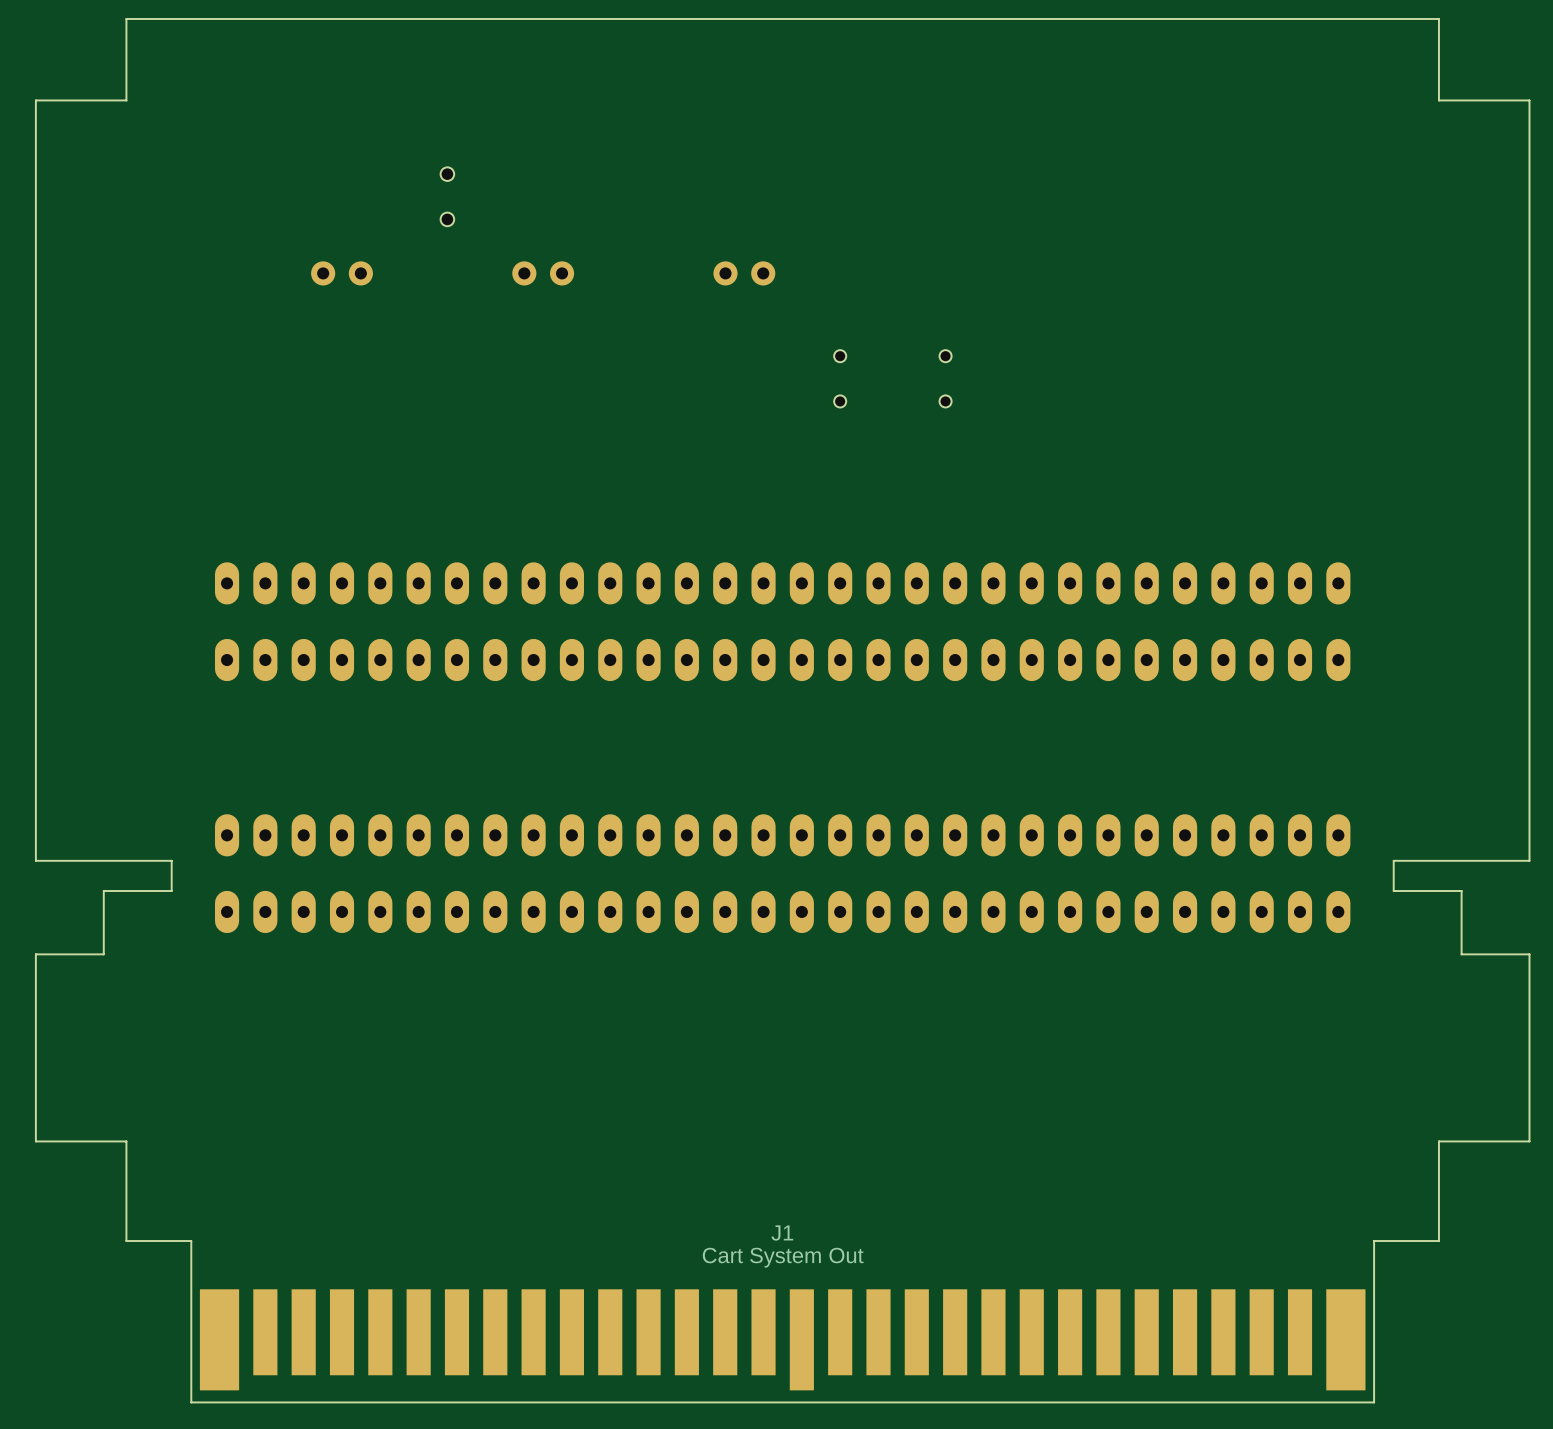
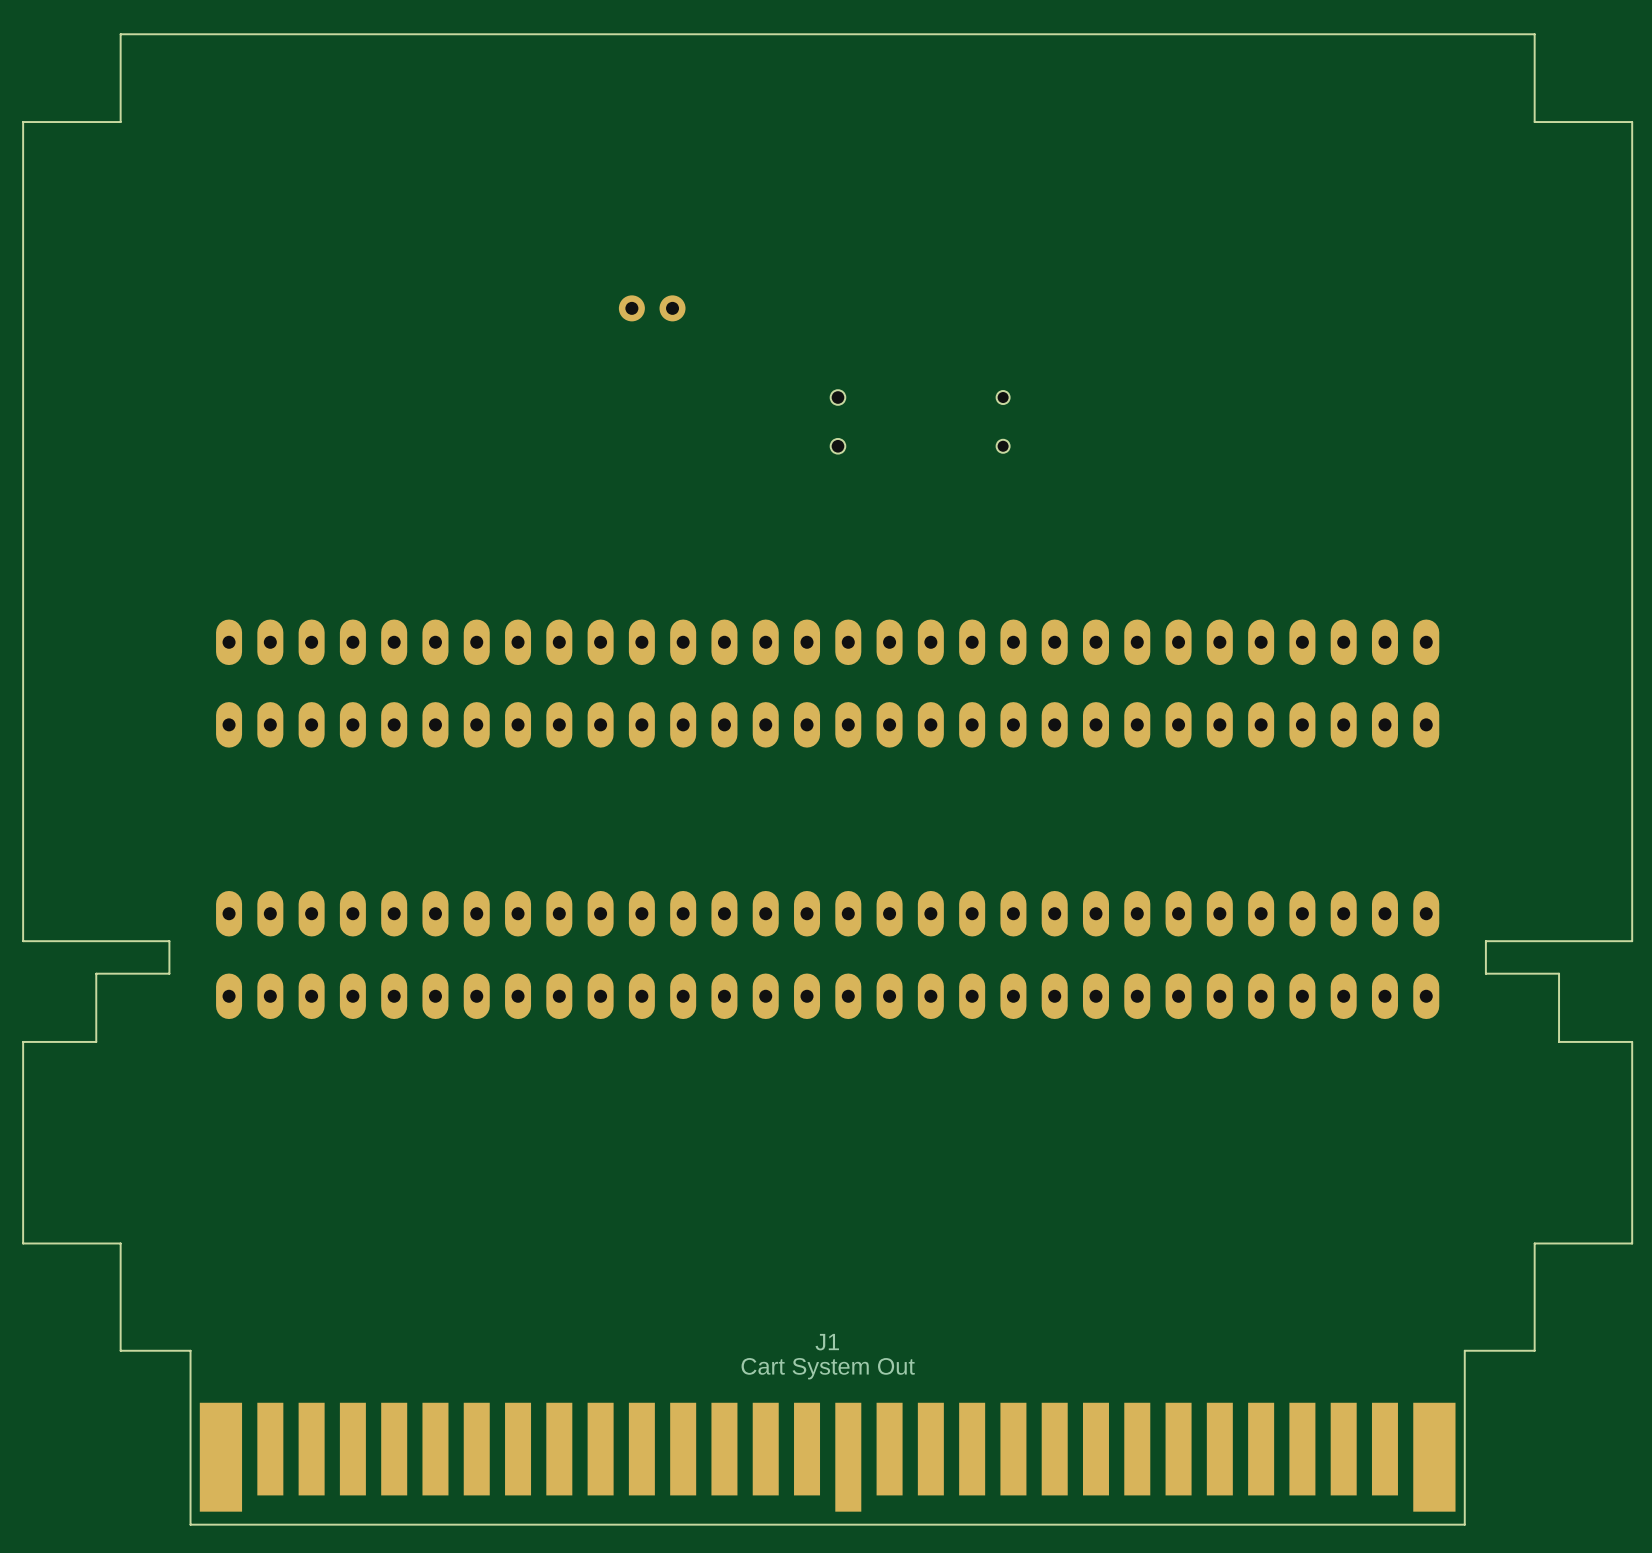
part: (447, 196) -> none
part: (342, 273) -> none
part: (543, 273) -> none
part: none -> (652, 308)
part: (744, 273) -> none
part: none -> (837, 421)
part: (840, 378) -> none

